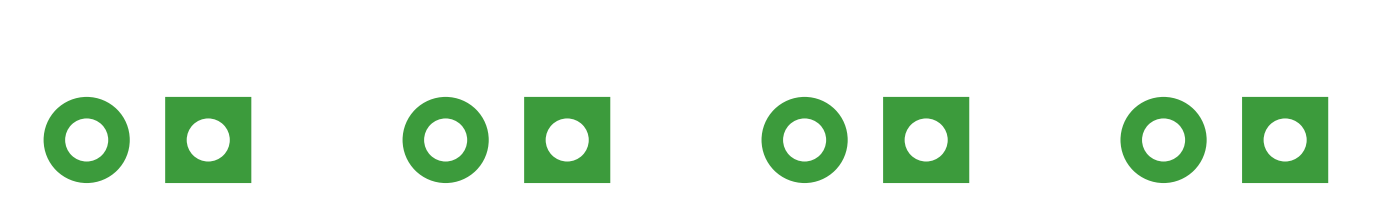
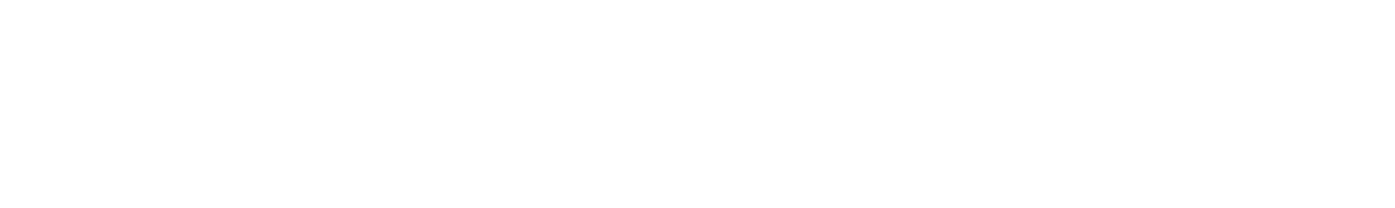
part: (147, 139) -> none
part: (506, 139) -> none
part: (865, 139) -> none
part: (1224, 139) -> none

